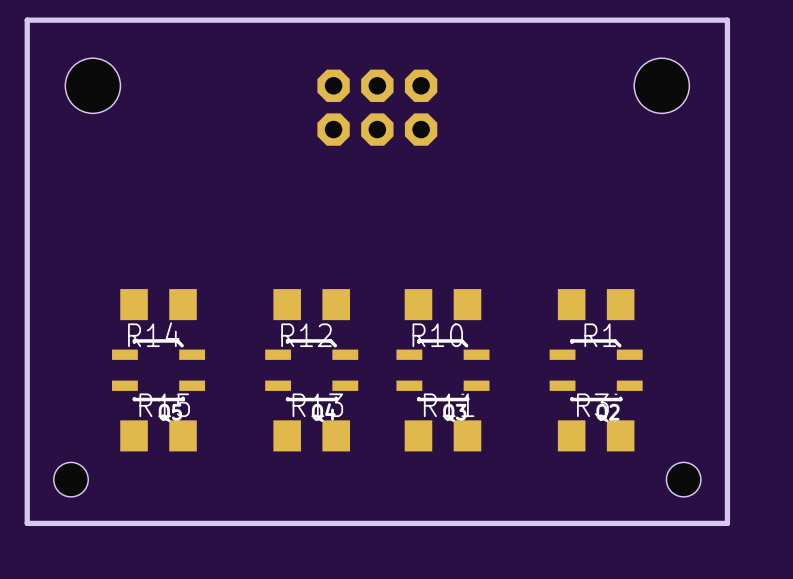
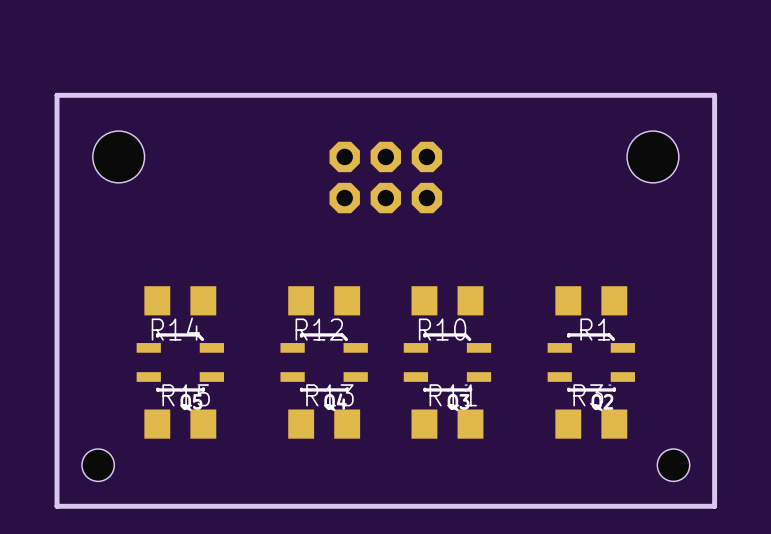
hole position: (92, 85) -> (118, 156)
hole position: (661, 85) -> (652, 156)
board edge: (727, 85) (727, 20) (27, 20) (27, 85) -> (714, 95) (57, 95)
part position: (377, 107) -> (385, 177)

